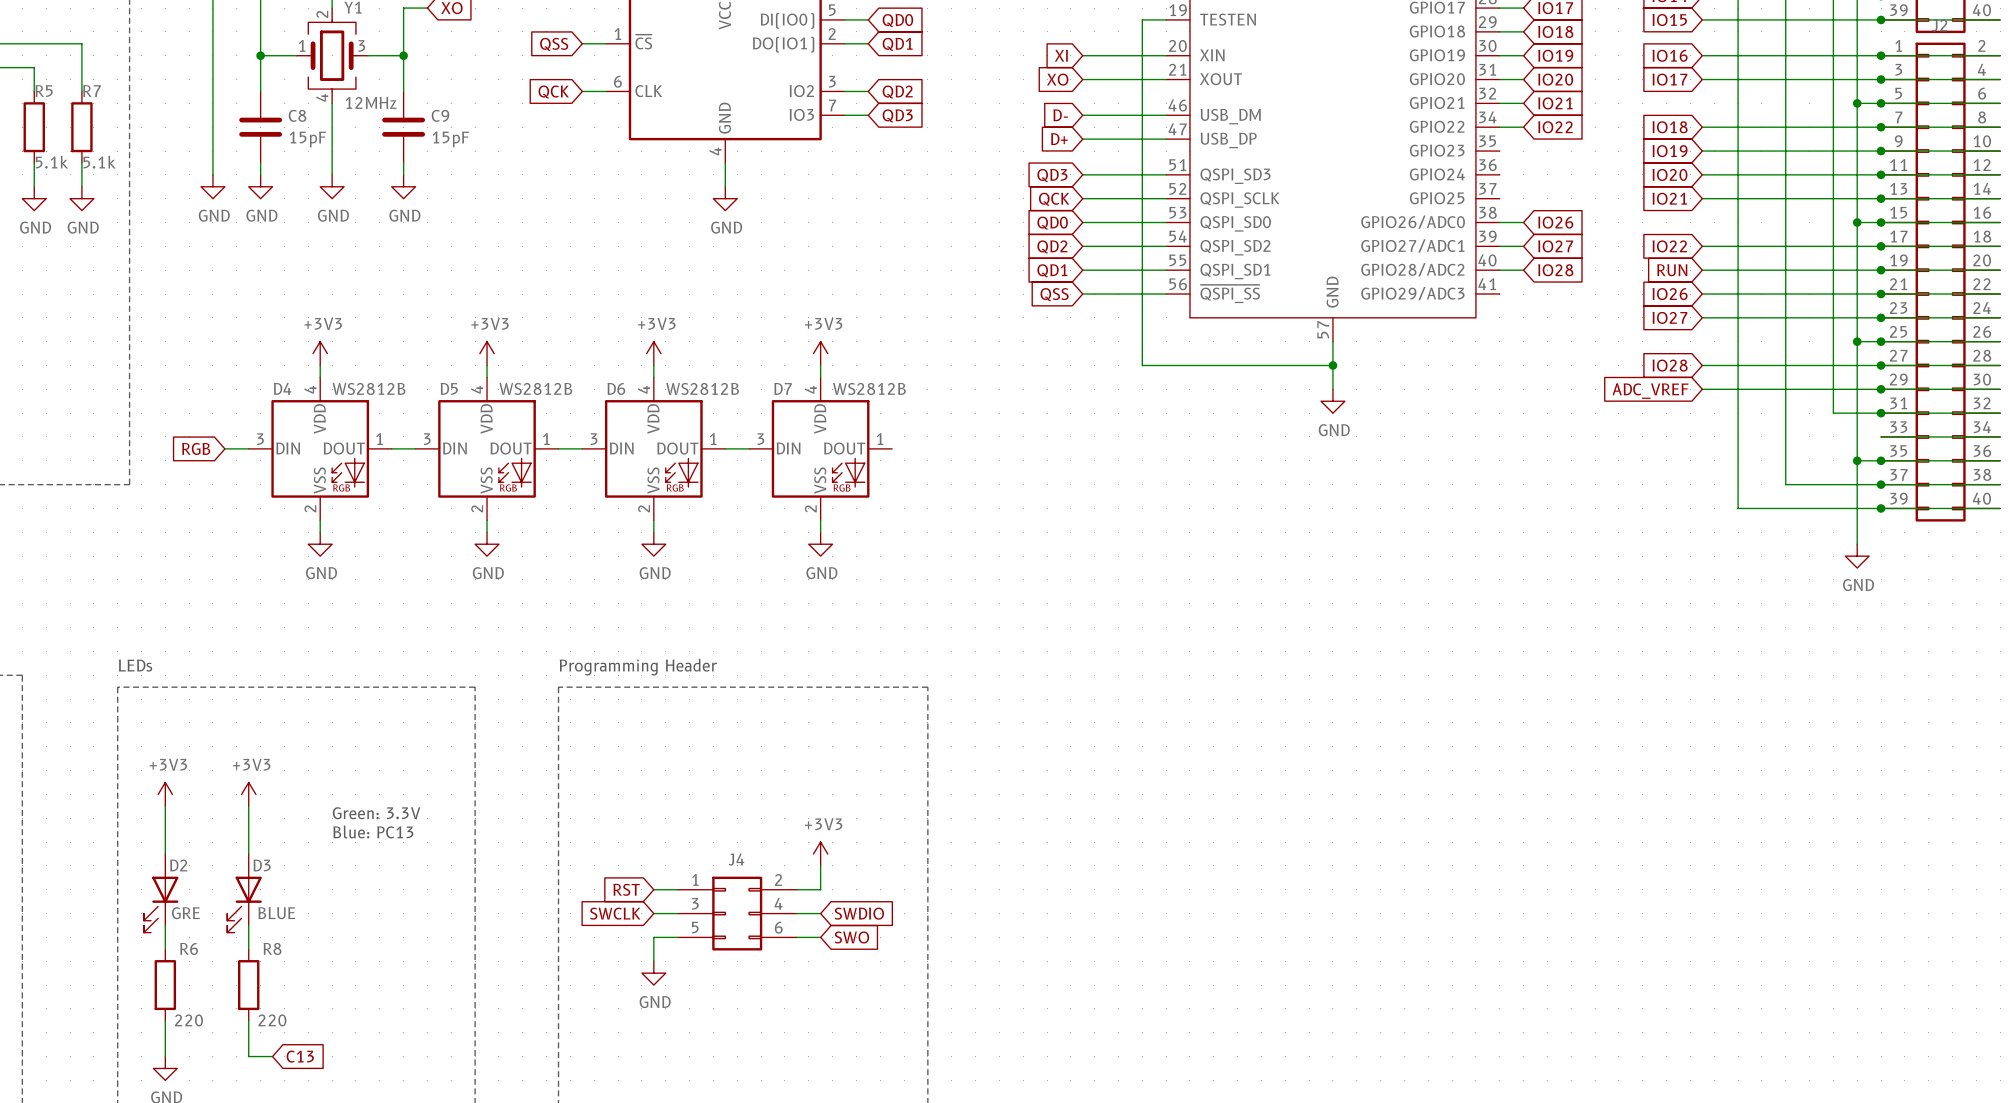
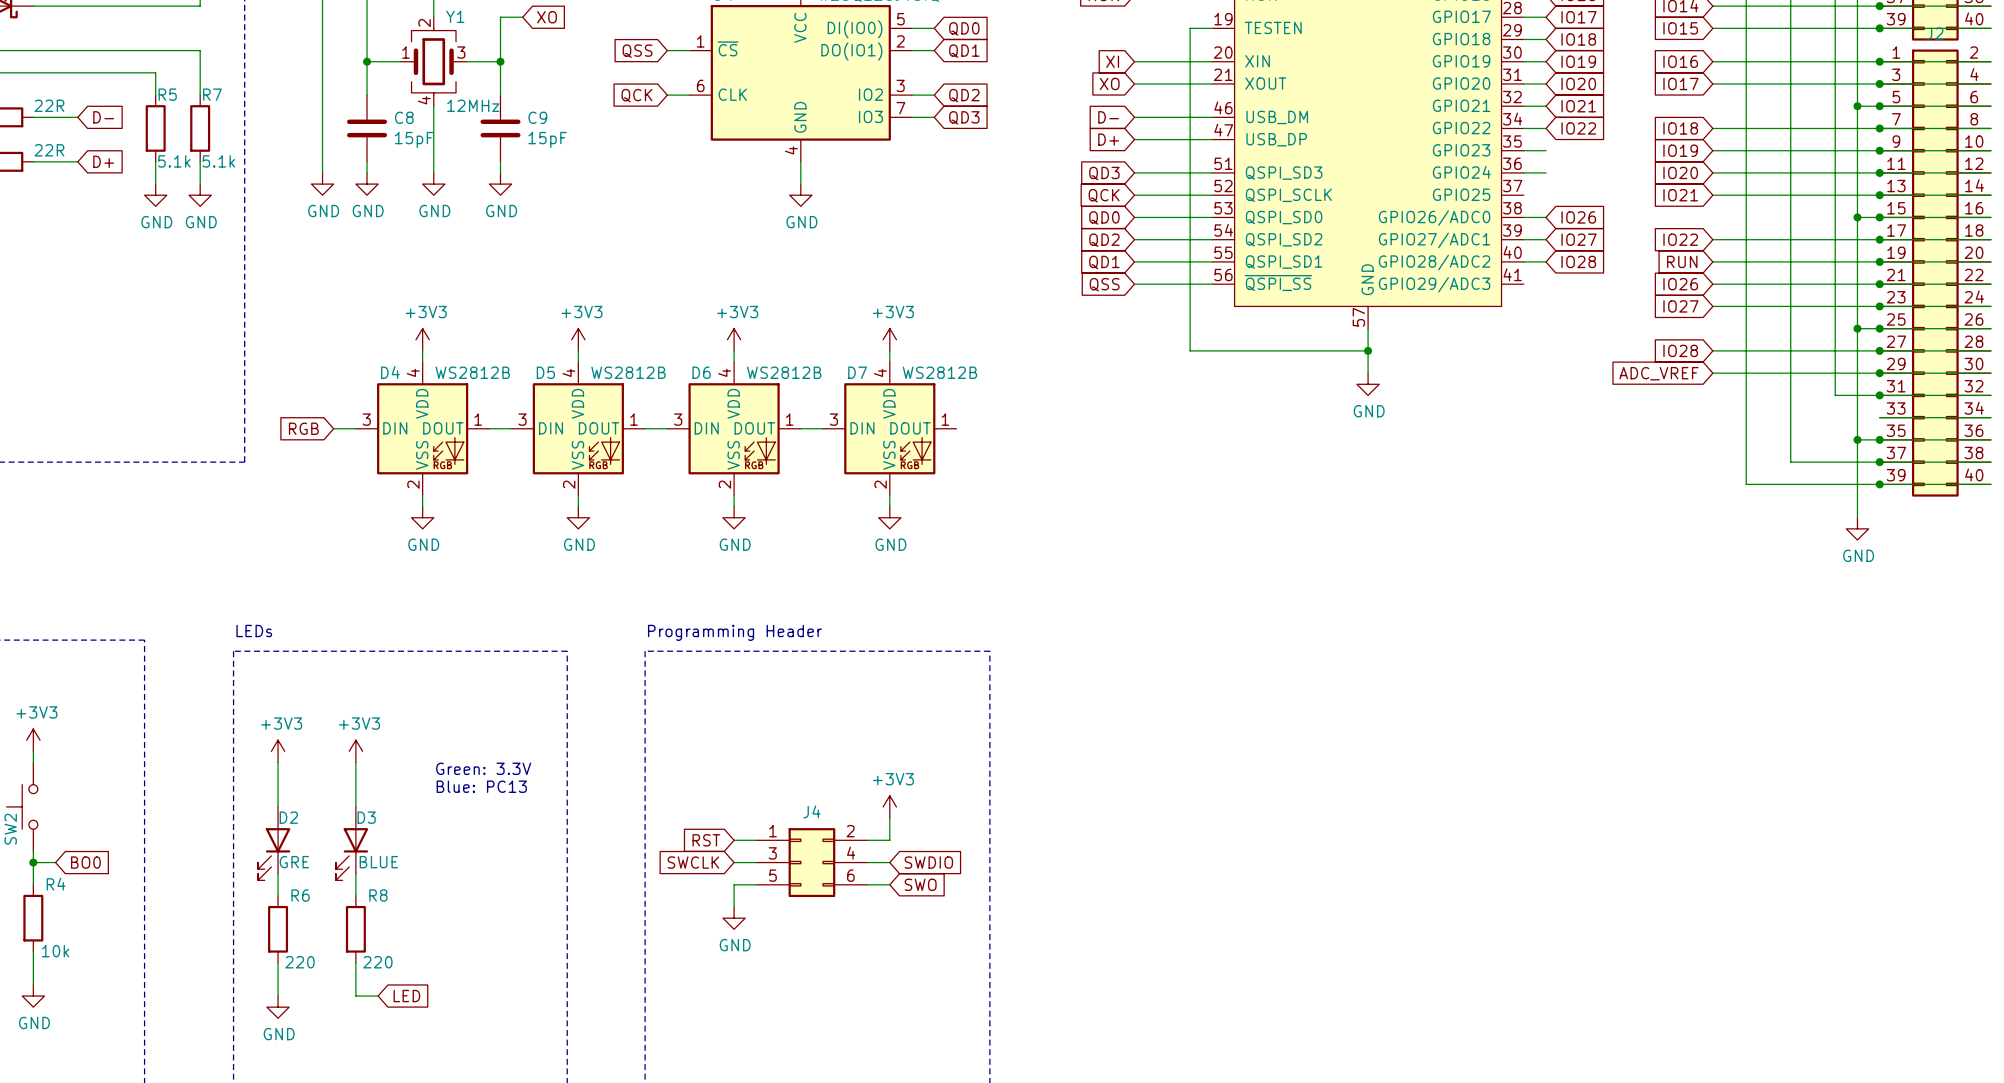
wire: none -> (1523, 150) (1546, 150)
wire: none -> (1523, 172) (1546, 172)
global label: C13 (300, 1056) -> LED (406, 996)

